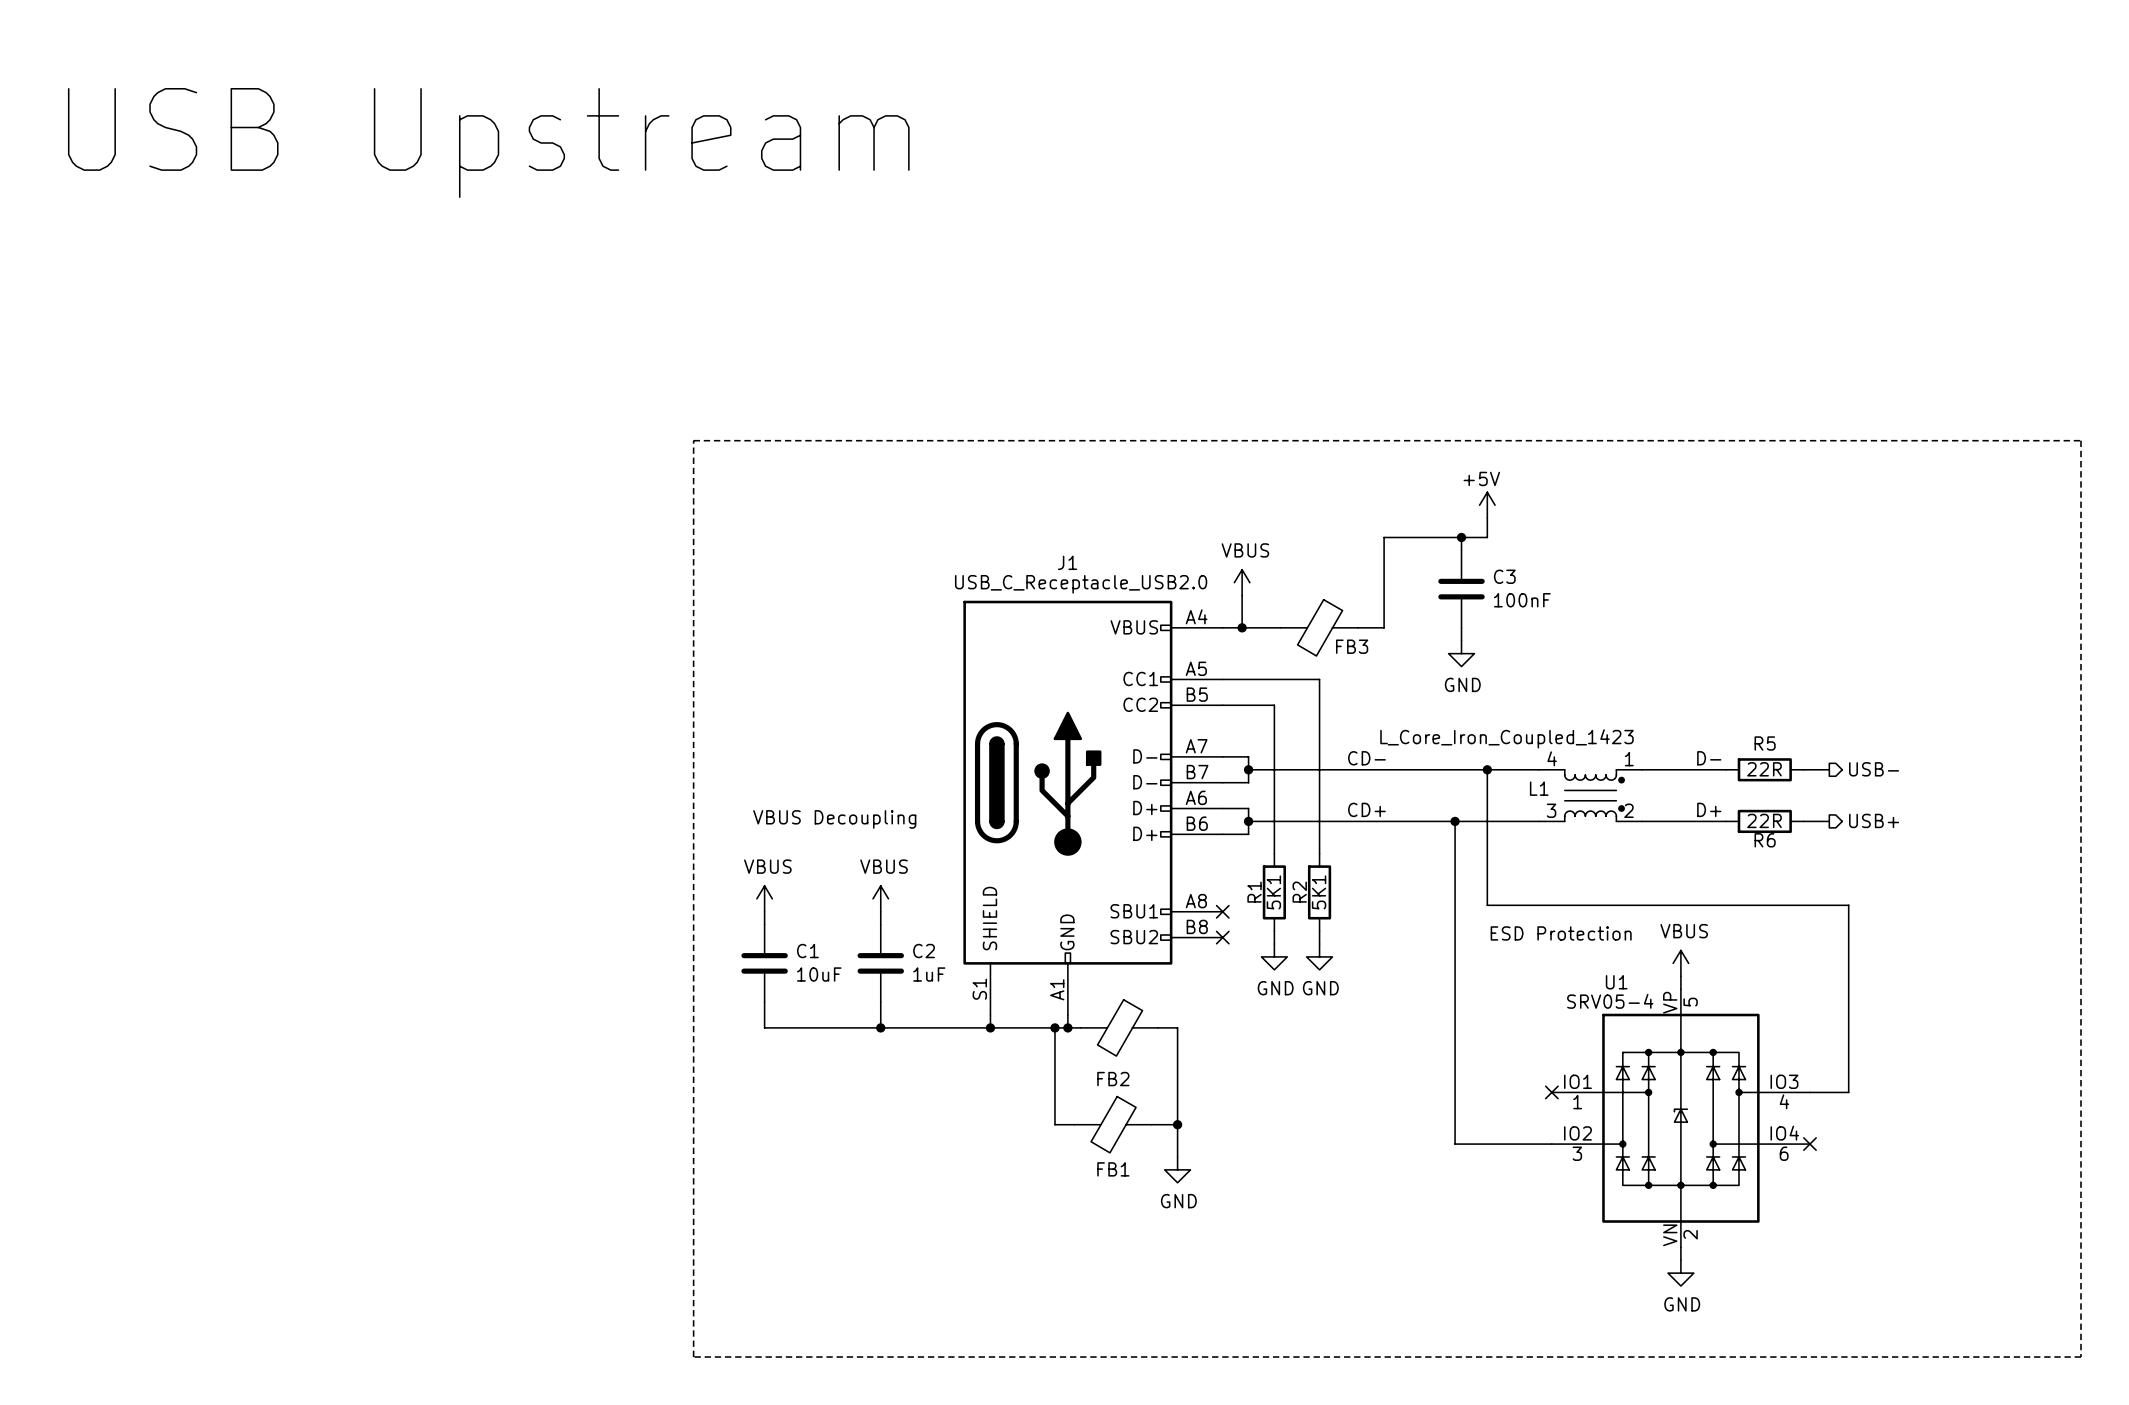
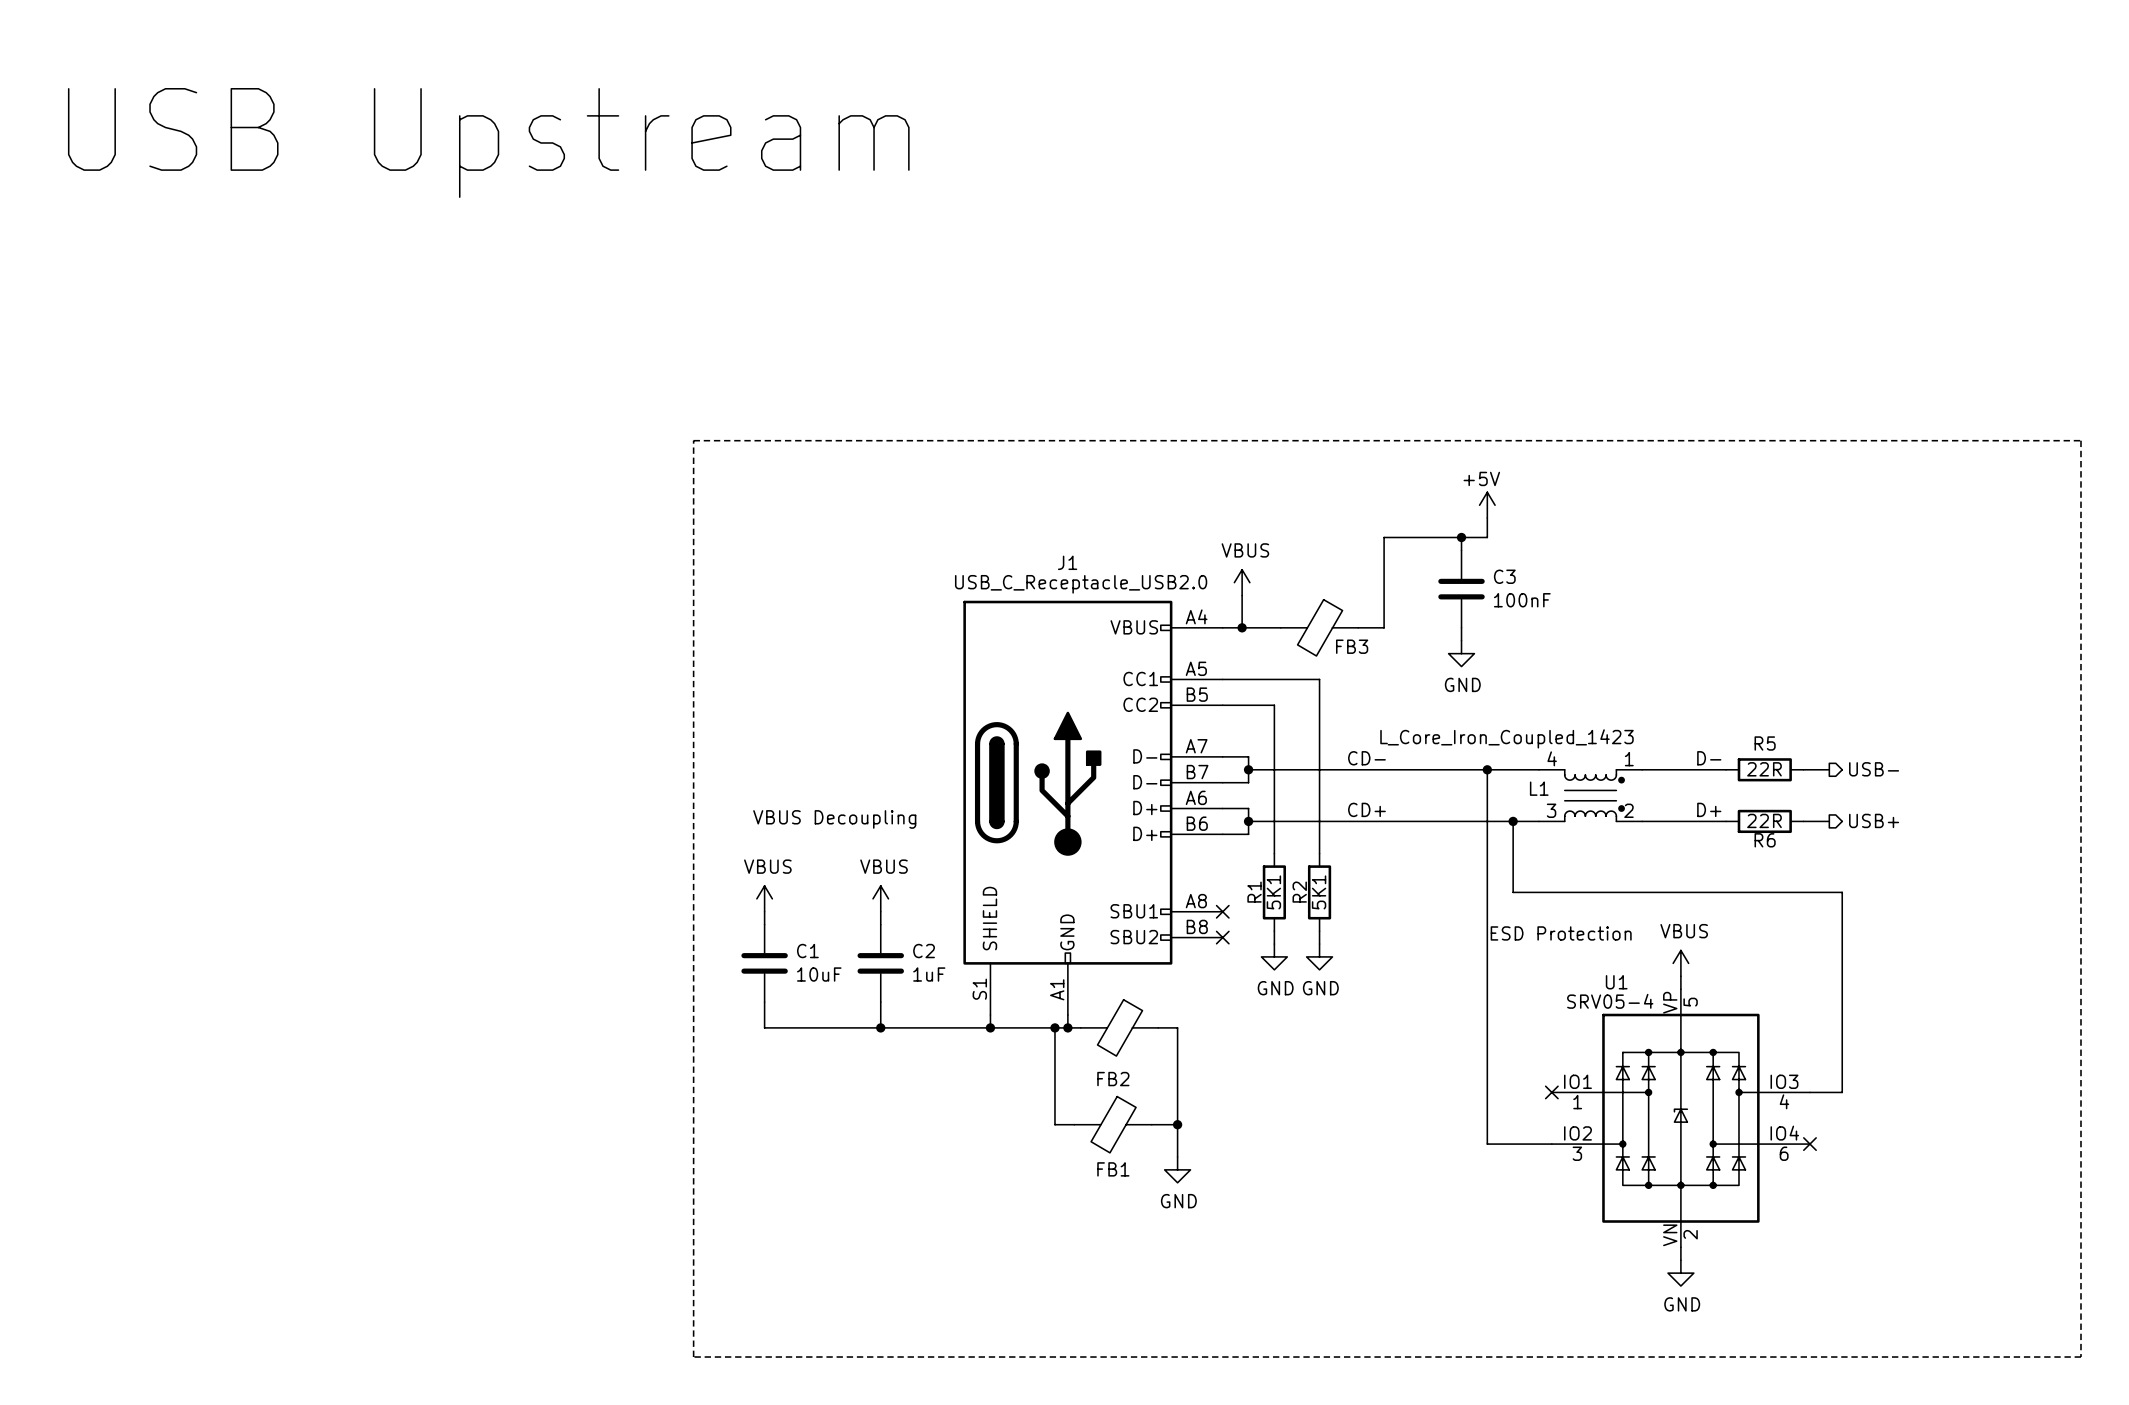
wire: (1455, 821) (1455, 1144) (1487, 1144) -> (1487, 905) (1487, 1144)
junction position: (1455, 821) -> (1513, 821)
wire: (1487, 905) (1848, 905) (1848, 1092) (1842, 1092) -> (1513, 821) (1513, 892) (1842, 892) (1842, 1092)

